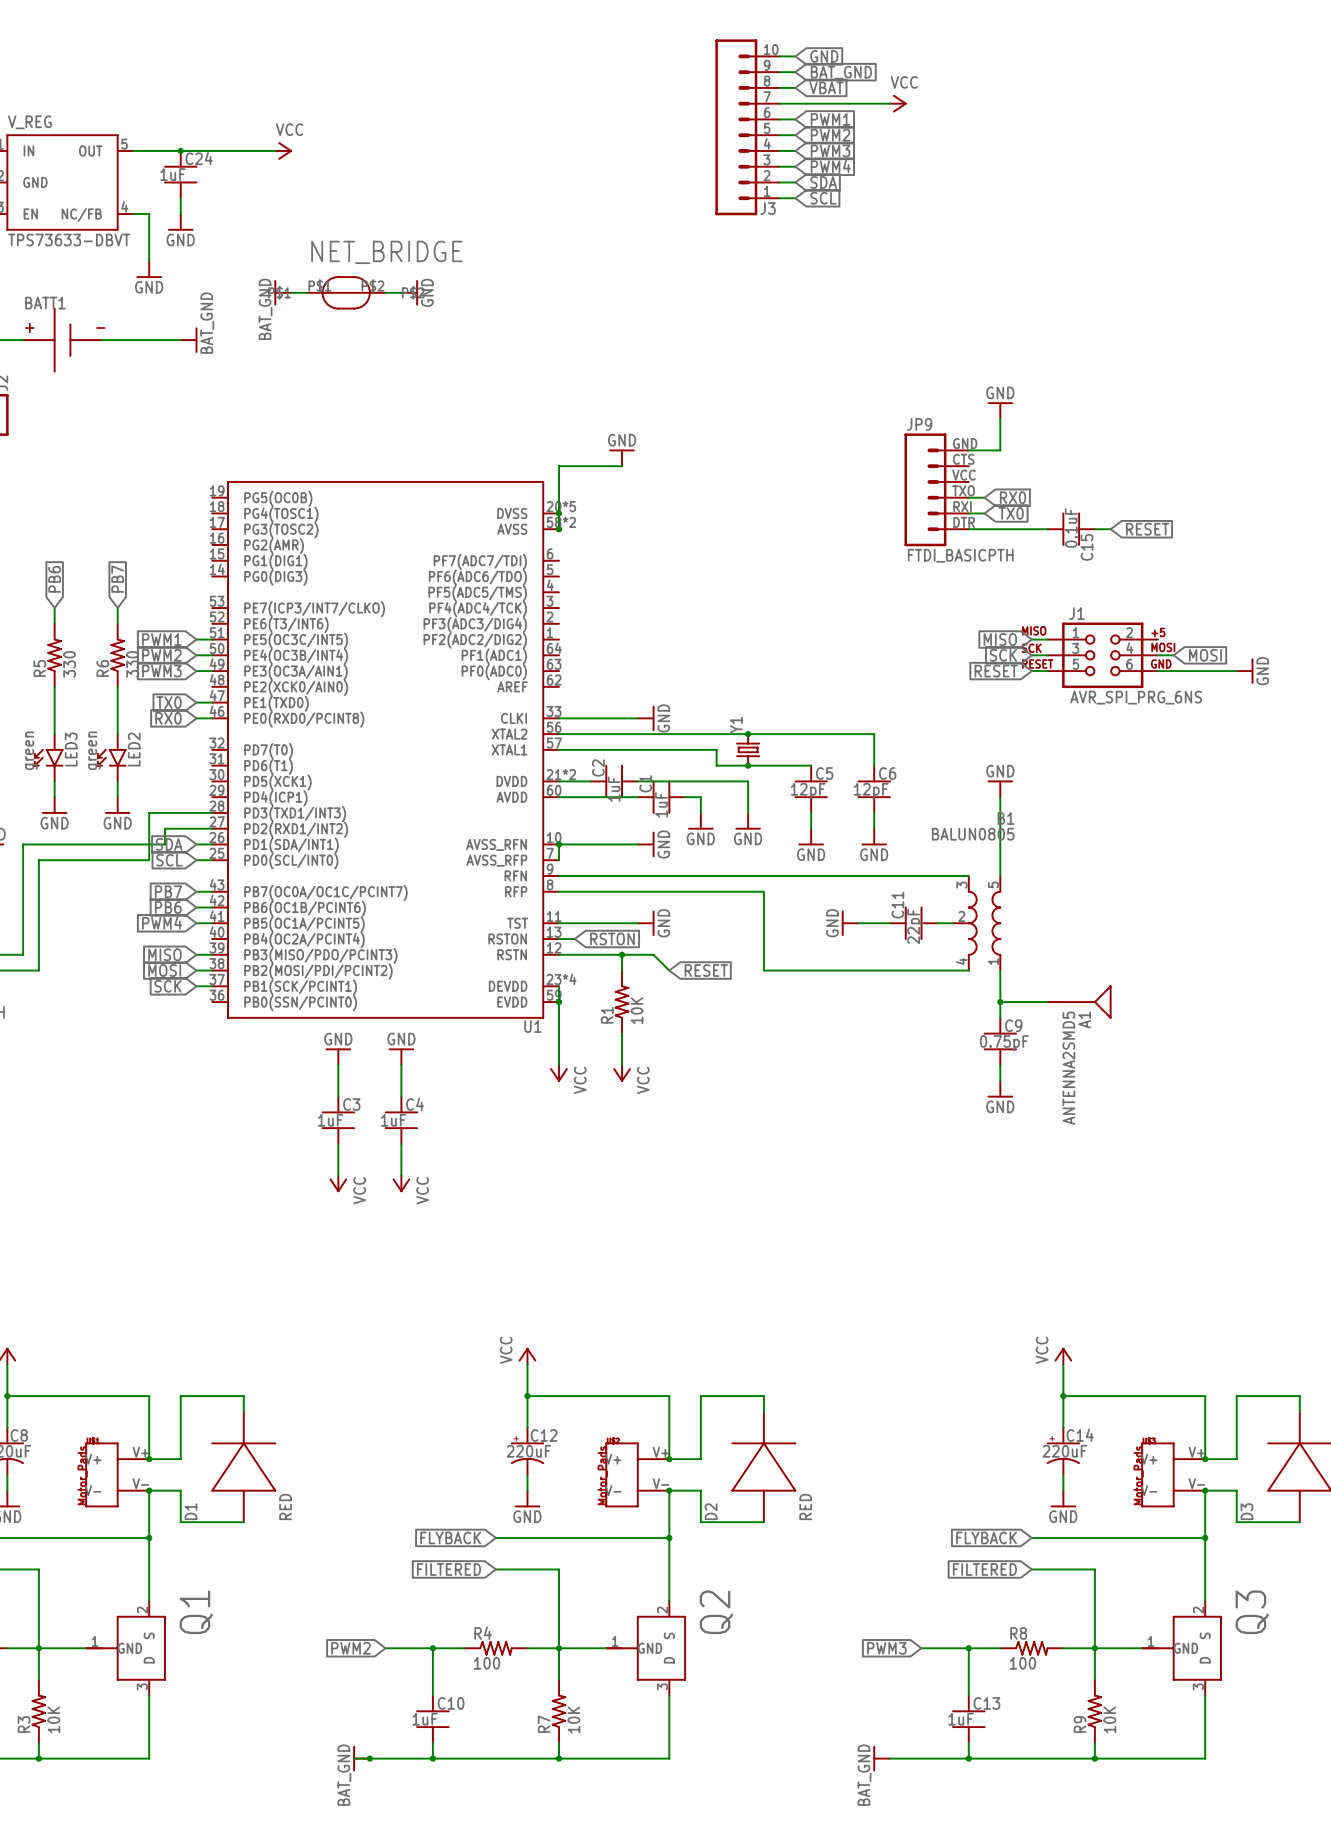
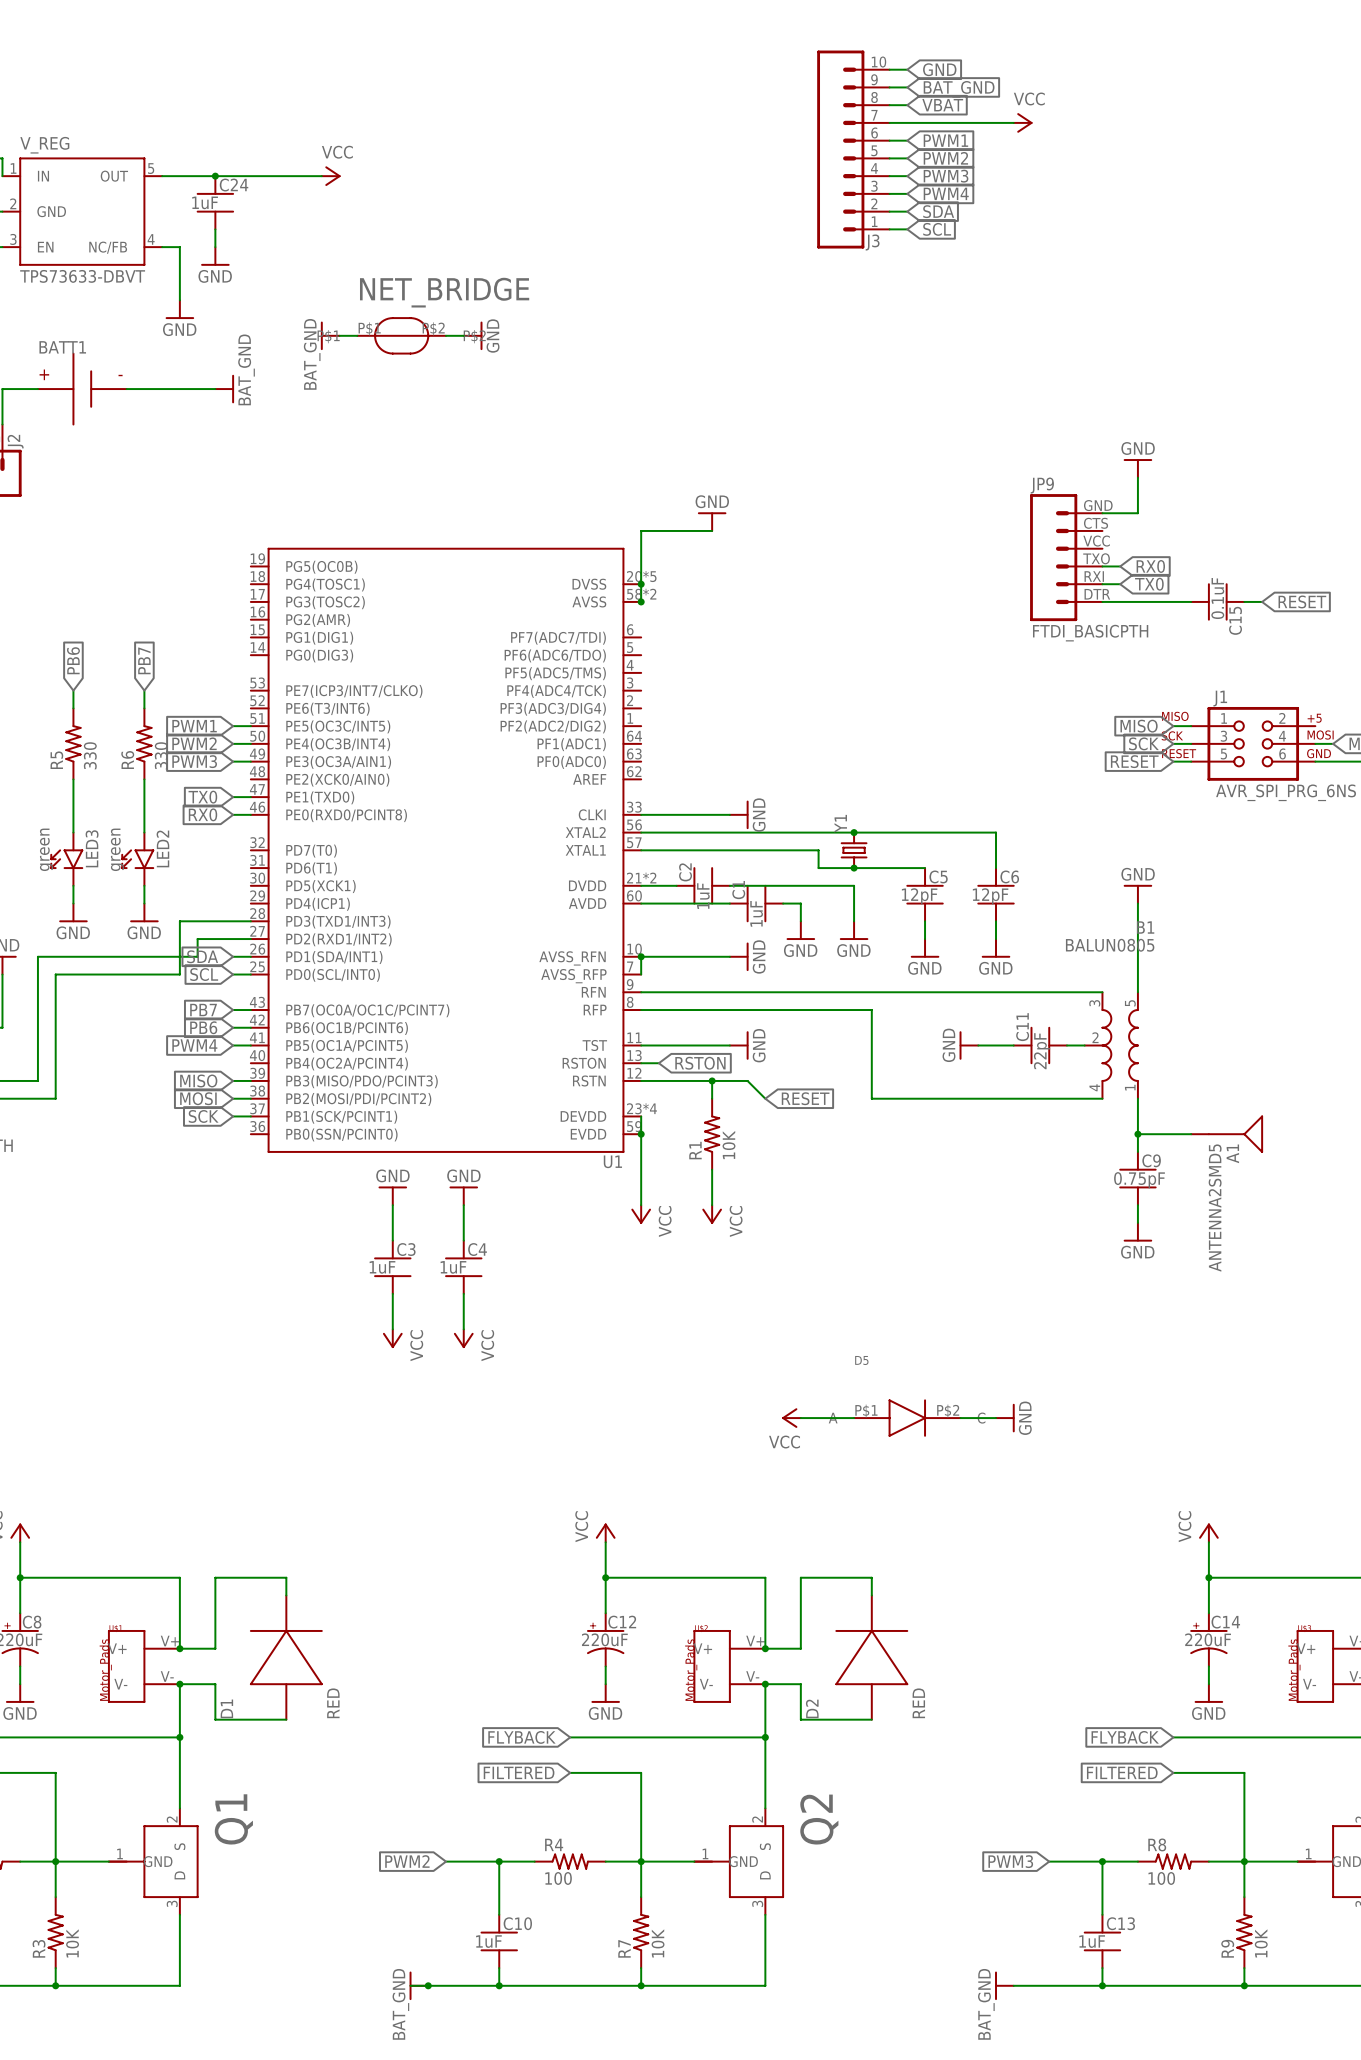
power symbol: none -> VCC (791, 1418)
wire: none -> (800, 1418) (854, 1418)
D5: none -> (907, 1418)
wire: none -> (960, 1418) (996, 1418)
power symbol: none -> GND (1005, 1418)

